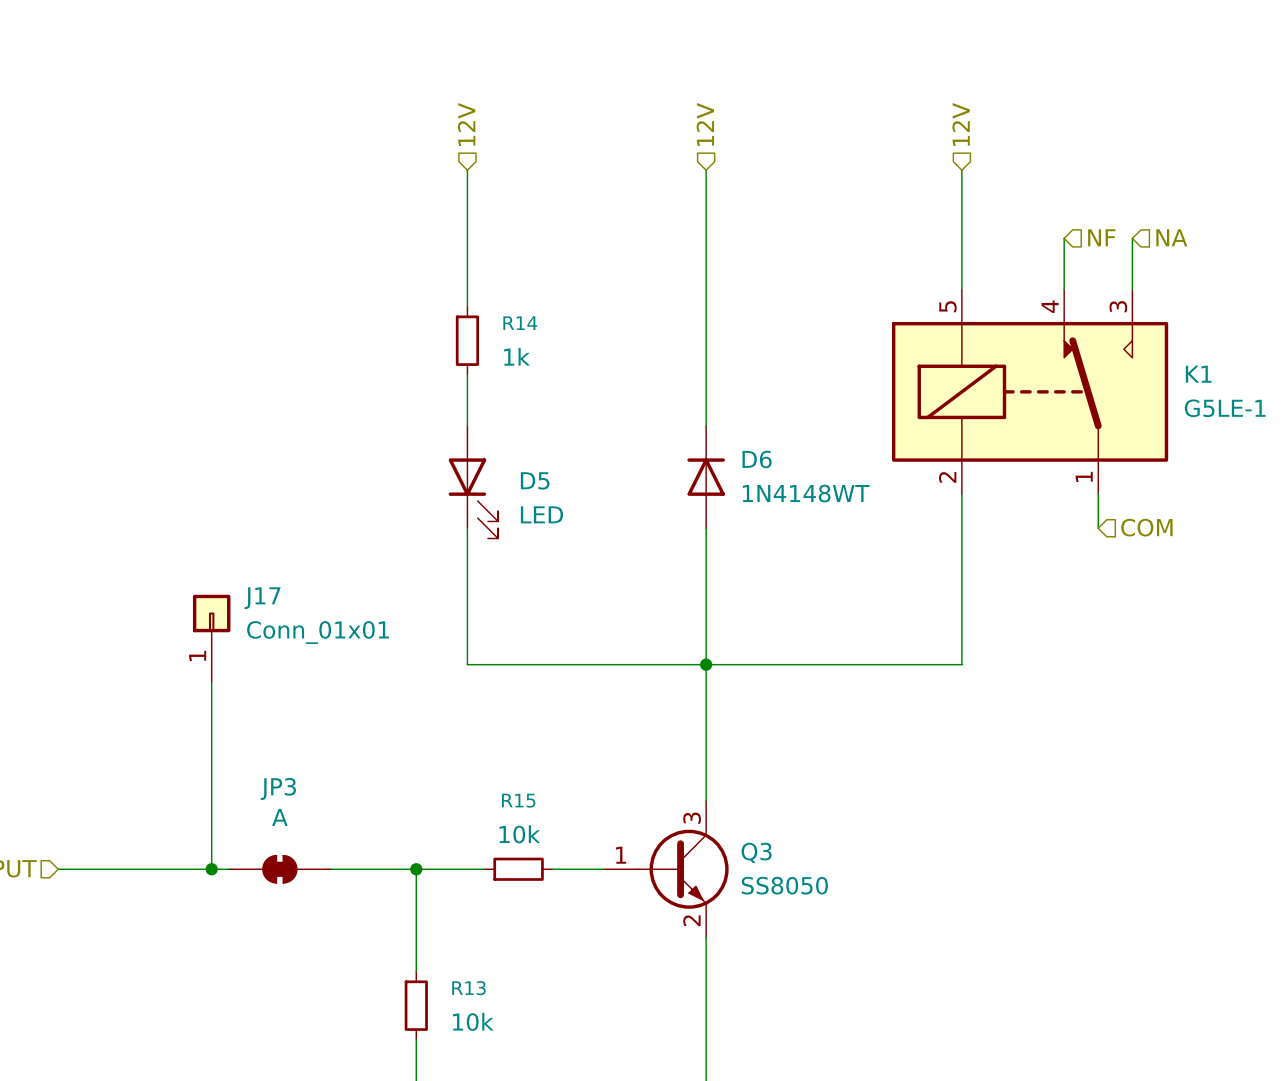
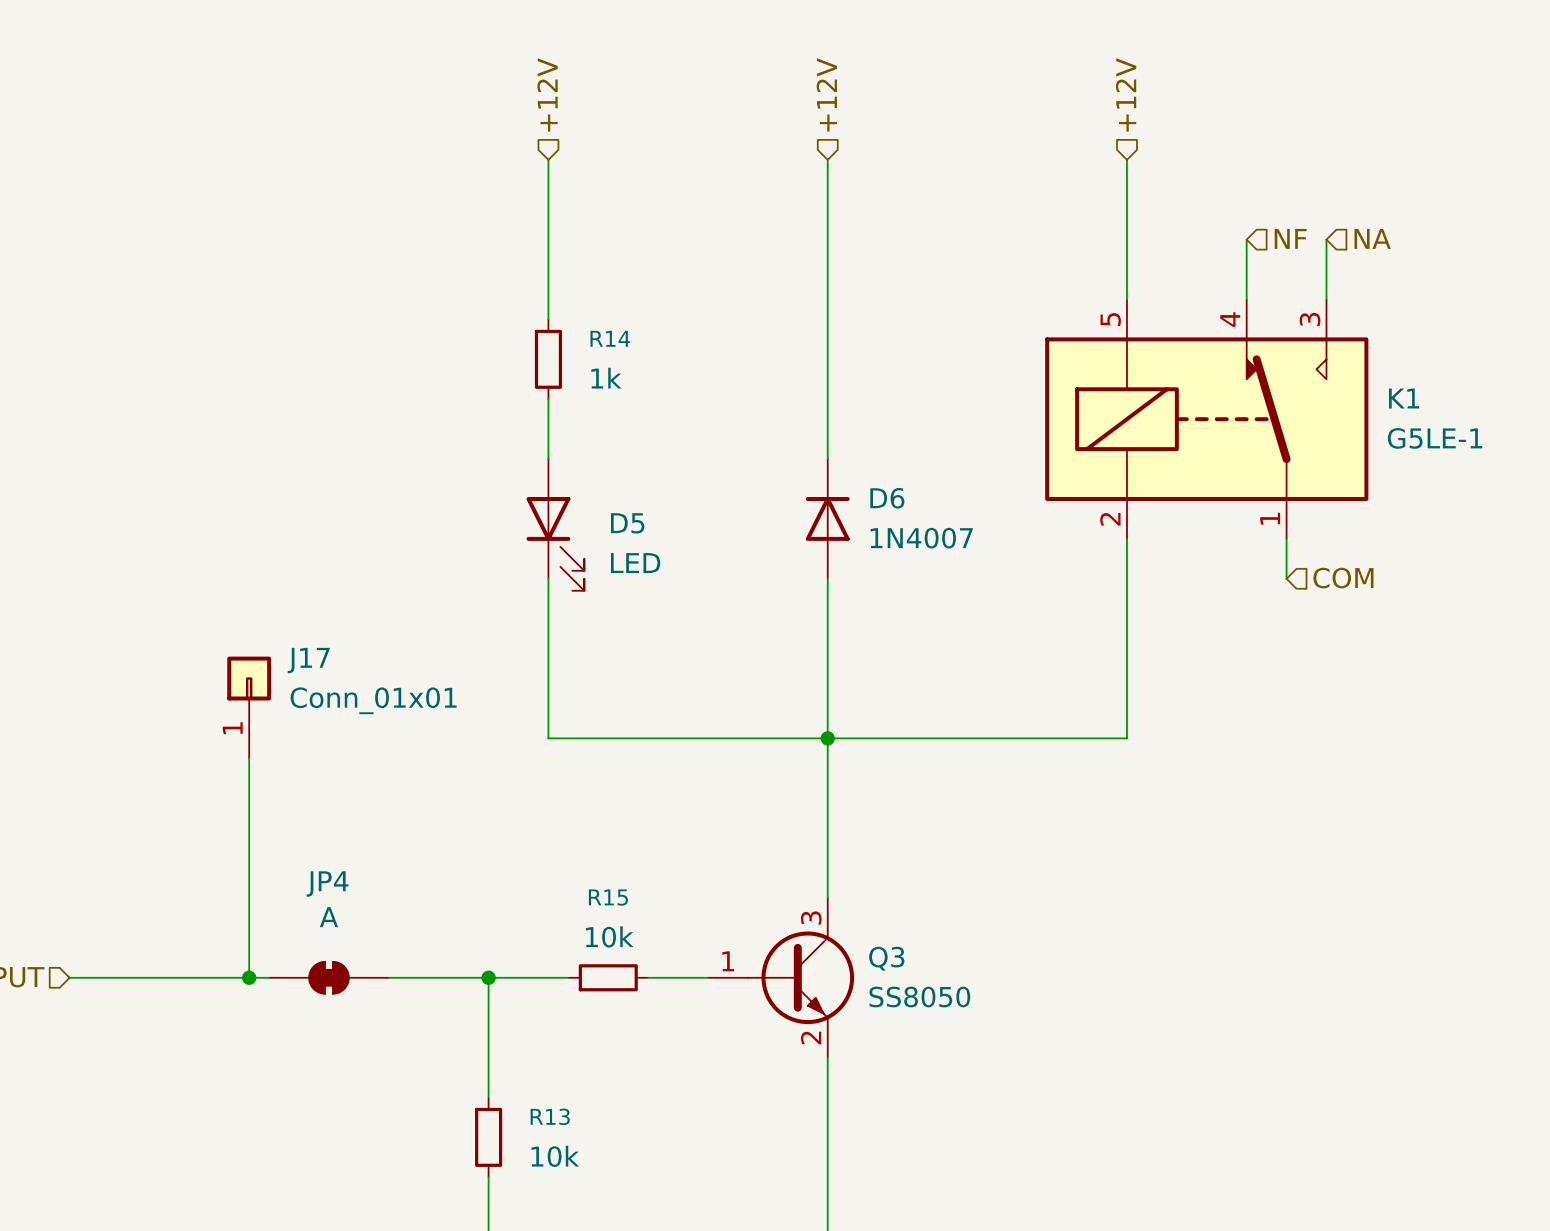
hierarchical label: 12V (466, 124) -> +12V (547, 94)
hierarchical label: 12V (705, 124) -> +12V (826, 94)
hierarchical label: 12V (961, 124) -> +12V (1126, 94)
D6 value: 1N4148WT (806, 493) -> 1N4007 (921, 538)
JP3 name: JP3 (278, 788) -> JP4 (327, 884)

